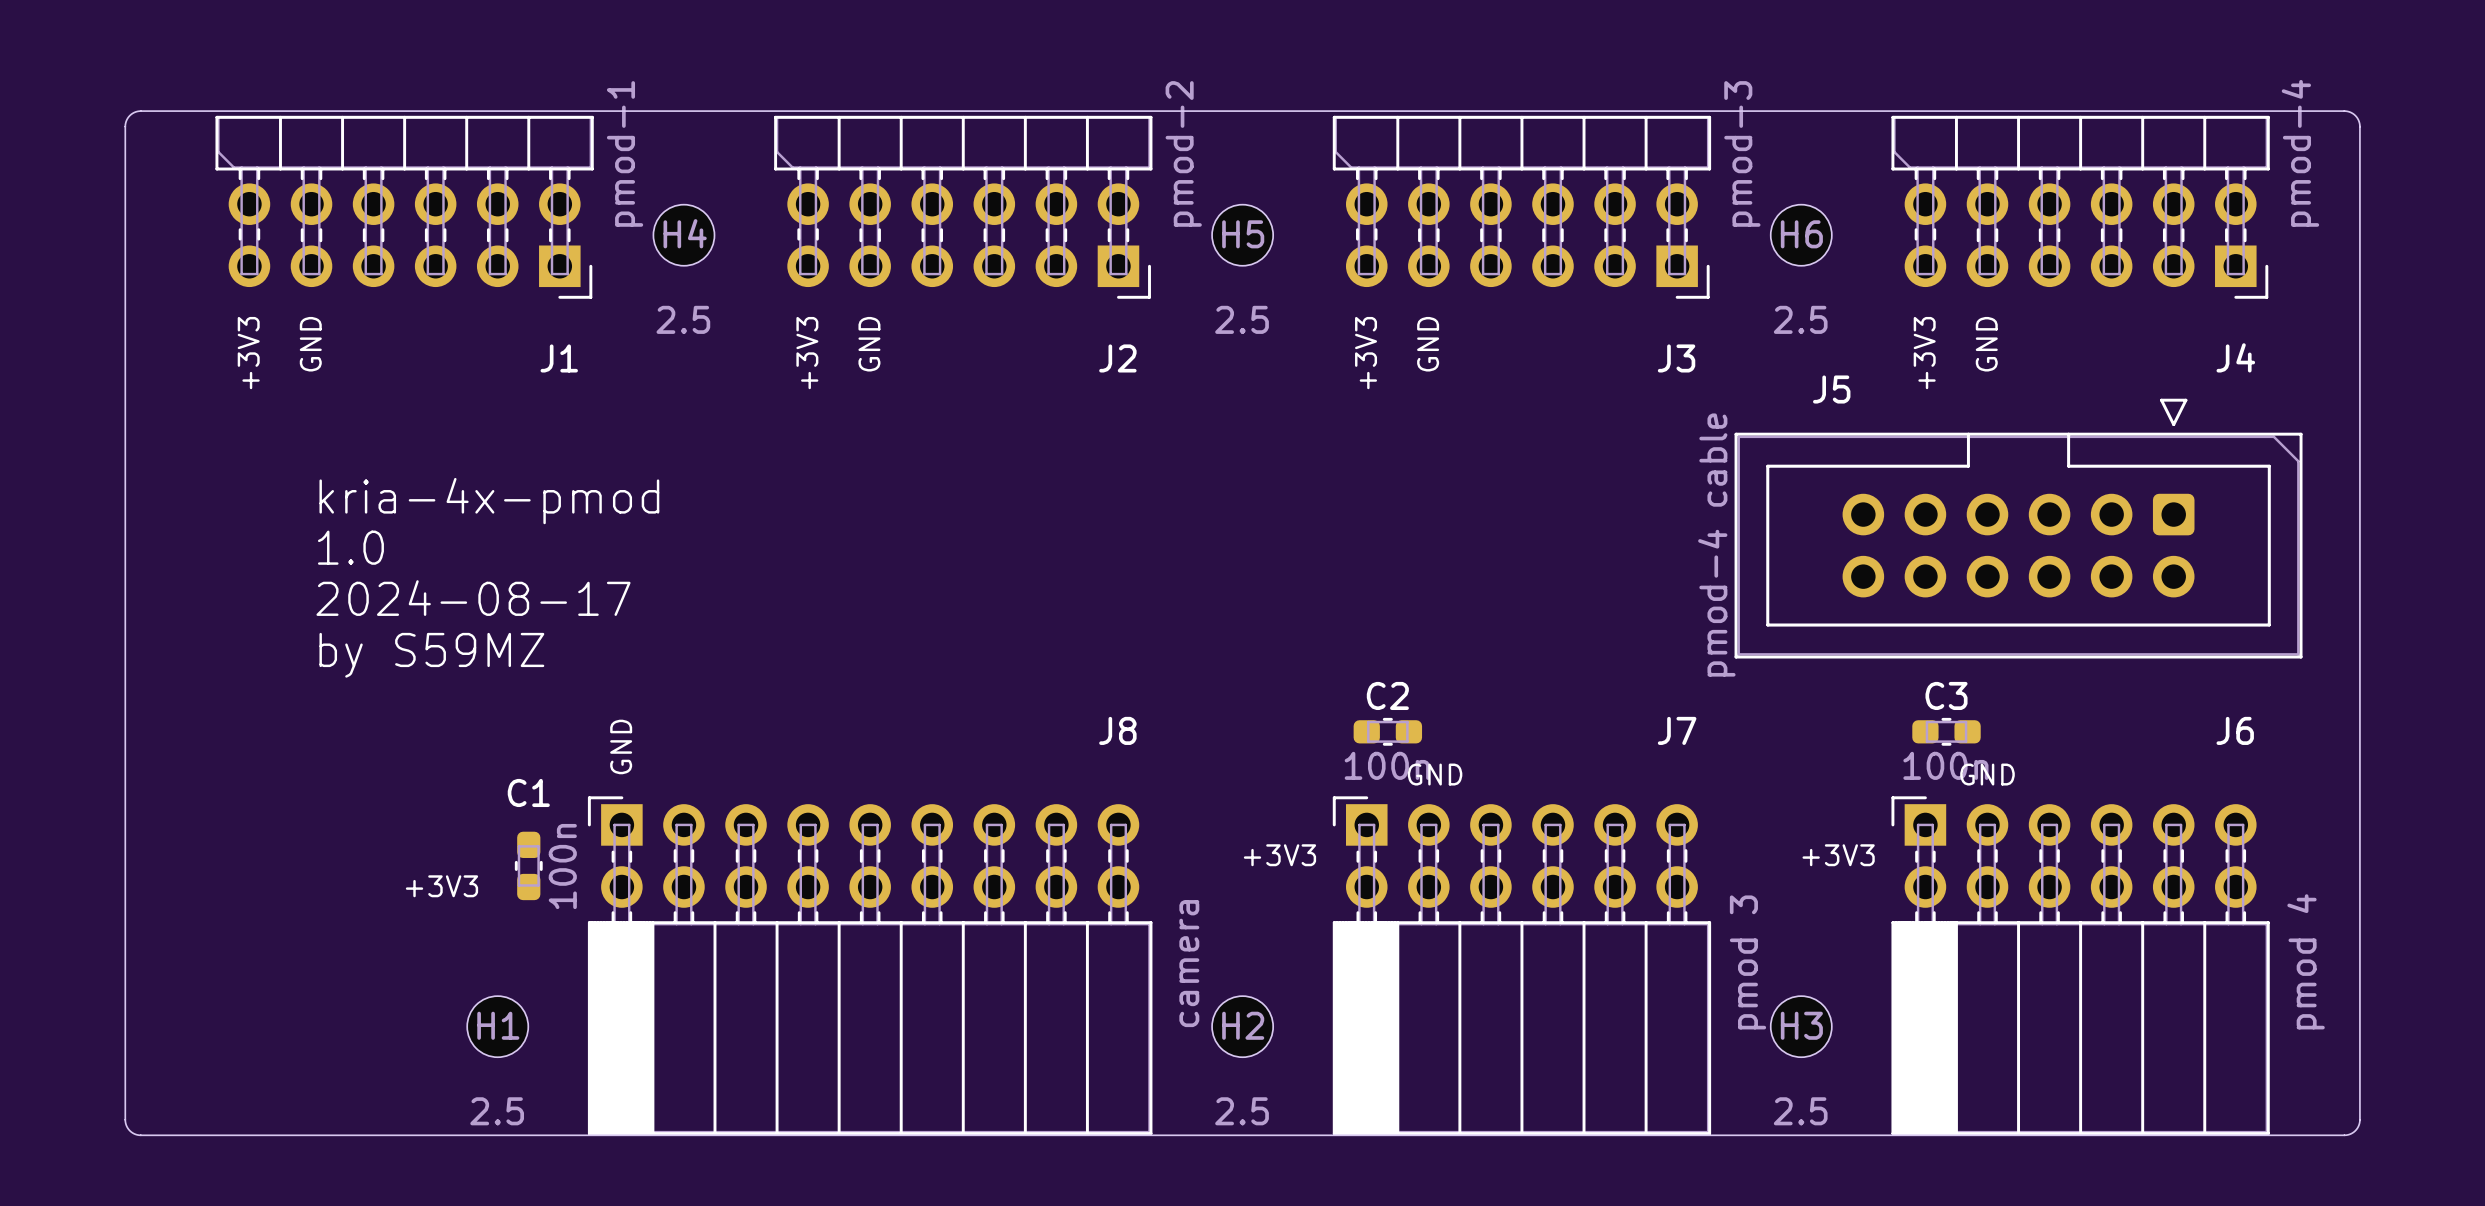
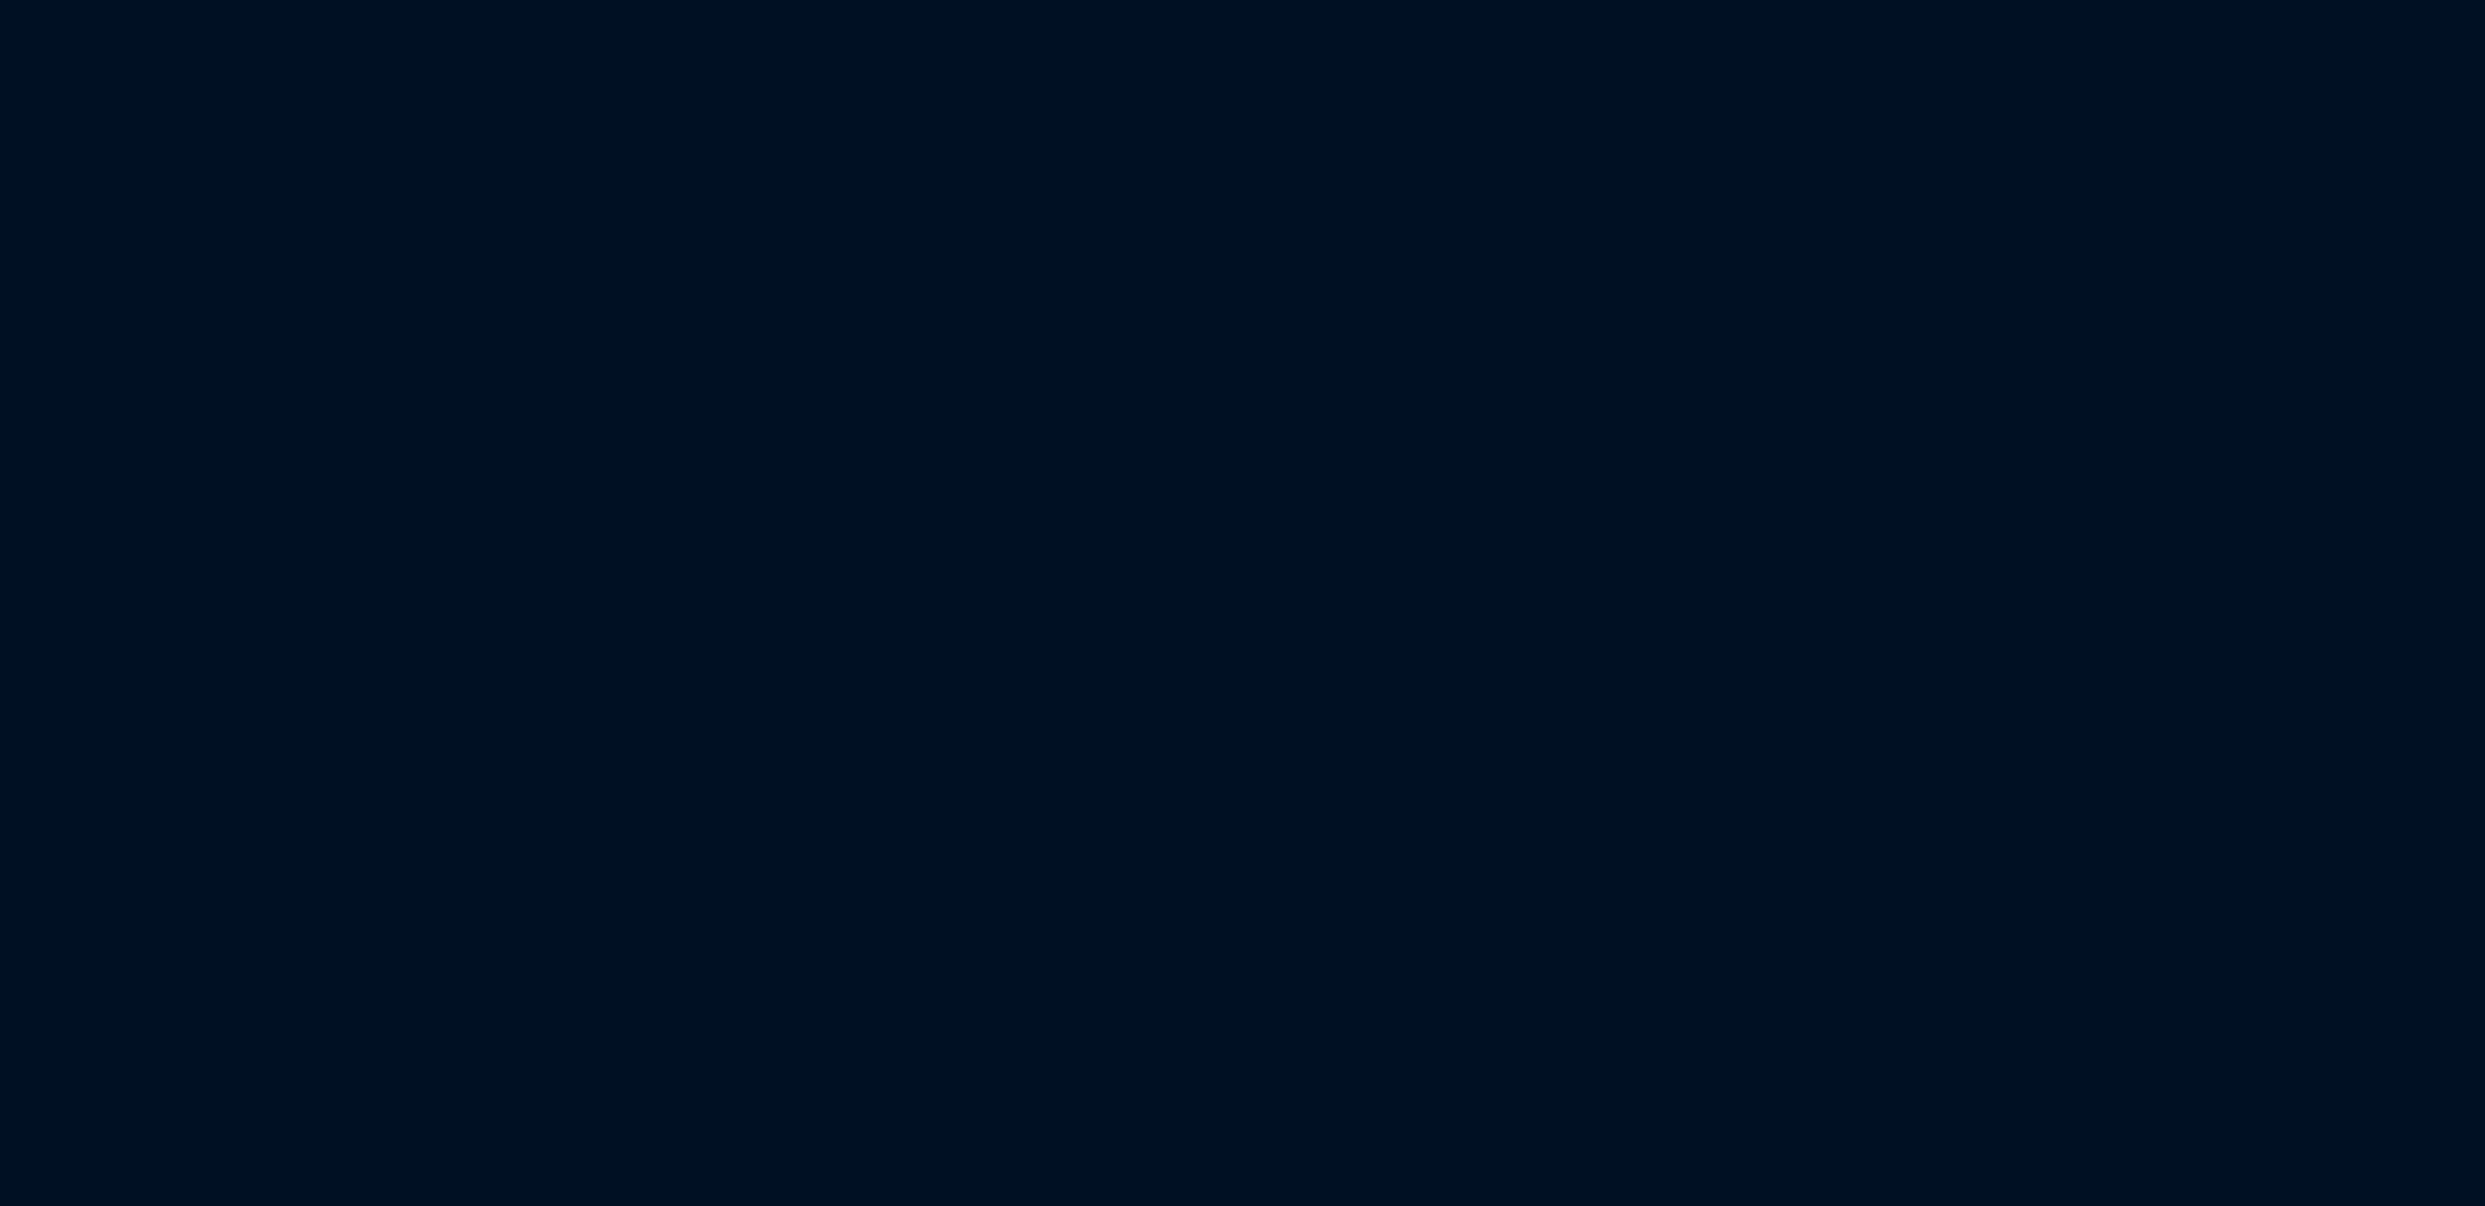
board edge: (140, 111) (2344, 111) (2351, 112) (2357, 118) (2359, 126) (2359, 1119) (2358, 1126) (2352, 1132) (2344, 1135) (140, 1135) (134, 1133) (127, 1128) (125, 1119) (125, 126) (129, 115) (140, 111) -> none
J1: pmod-1 (404, 207) -> none
J2: pmod-2 (963, 207) -> none
J3: pmod-3 (1521, 207) -> none
J4: pmod-4 (2080, 207) -> none
H4: 2.5 (683, 235) -> none
H5: 2.5 (1242, 235) -> none
H6: 2.5 (1801, 235) -> none
text: GND (310, 344) -> none
text: GND (869, 344) -> none
text: GND (1428, 344) -> none
text: GND (1986, 344) -> none
text: +3V3 (248, 353) -> none
text: +3V3 (807, 353) -> none
text: +3V3 (1366, 353) -> none
text: +3V3 (1924, 353) -> none
text: kria-4x-pmod (489, 501) -> none
J5: pmod-4 cable (2018, 528) -> none
text: 1.0 (350, 547) -> none
text: 2024-08-17 (473, 598) -> none
text: by S59MZ (431, 655) -> none
C2: 100n (1387, 731) -> none
C3: 100n (1946, 731) -> none
text: GND (621, 746) -> none
text: GND (1435, 774) -> none
text: GND (1987, 774) -> none
text: +3V3 (1279, 855) -> none
text: +3V3 (1838, 855) -> none
C1: 100n (528, 865) -> none
text: +3V3 (441, 886) -> none
J8: camera (870, 965) -> none
J7: pmod 3 (1521, 965) -> none
J6: pmod 4 (2080, 965) -> none
H1: 2.5 (497, 1026) -> none
H2: 2.5 (1242, 1026) -> none
H3: 2.5 (1801, 1026) -> none

